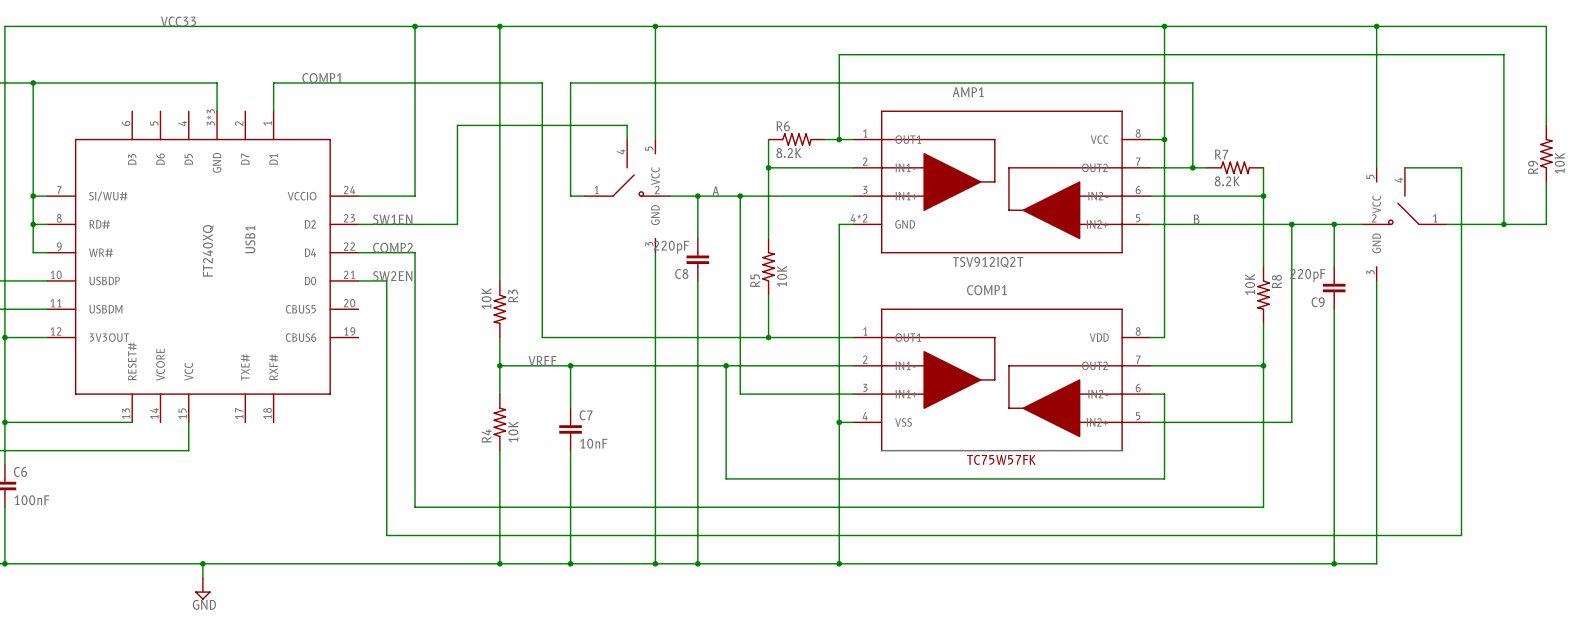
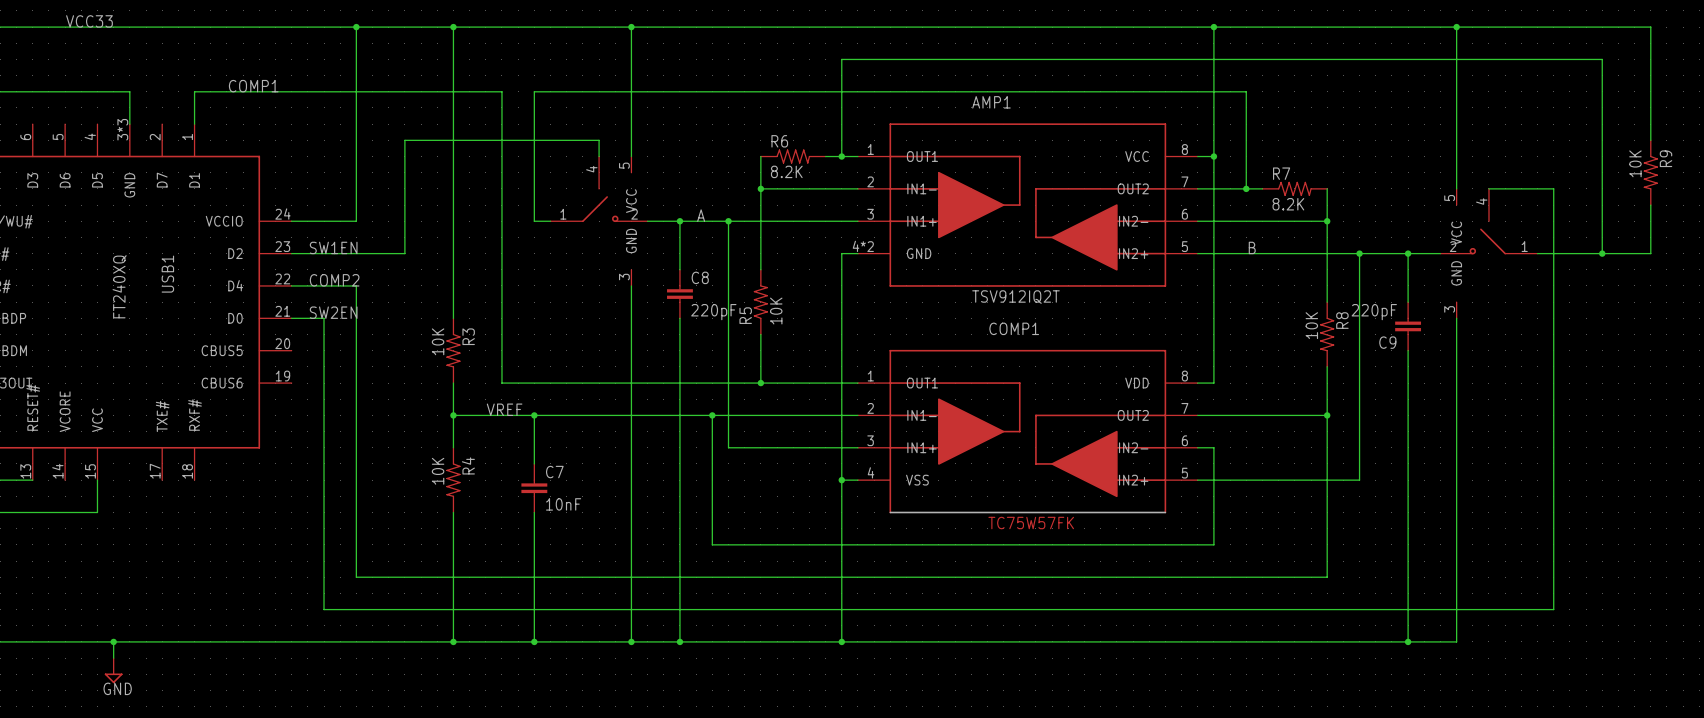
R9 rotation: 0° (1546, 153) -> 180° (1650, 172)
C8 value position: 220pF (671, 247) -> 220pF (713, 312)
C8 name position: C8 (681, 273) -> C8 (700, 277)
R4 rotation: 0° (499, 422) -> 180° (453, 480)

